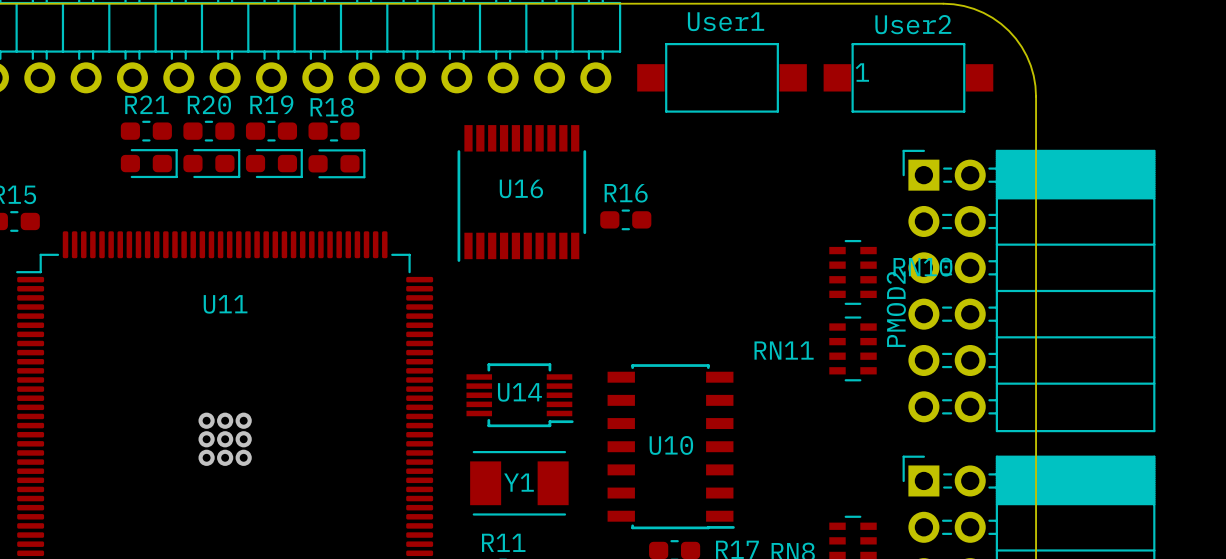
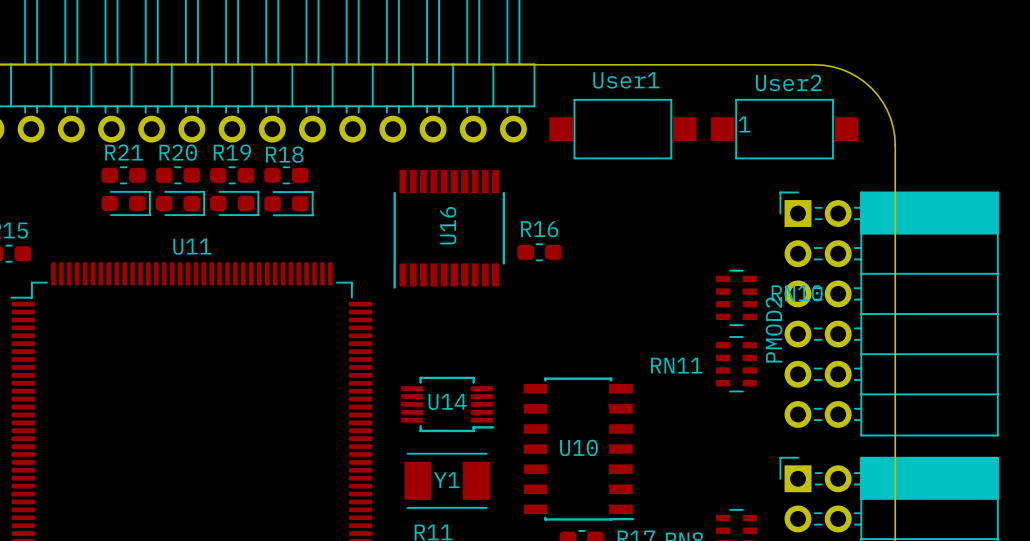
U16 name rotation: 0° (521, 188) -> 90° counterclockwise (448, 225)
U11 name position: U11 (225, 304) -> U11 (192, 246)
via: (206, 420) -> none
via: (225, 420) -> none
via: (243, 420) -> none
via: (206, 439) -> none
via: (225, 439) -> none
via: (243, 439) -> none
via: (206, 457) -> none
via: (225, 457) -> none
via: (243, 457) -> none

